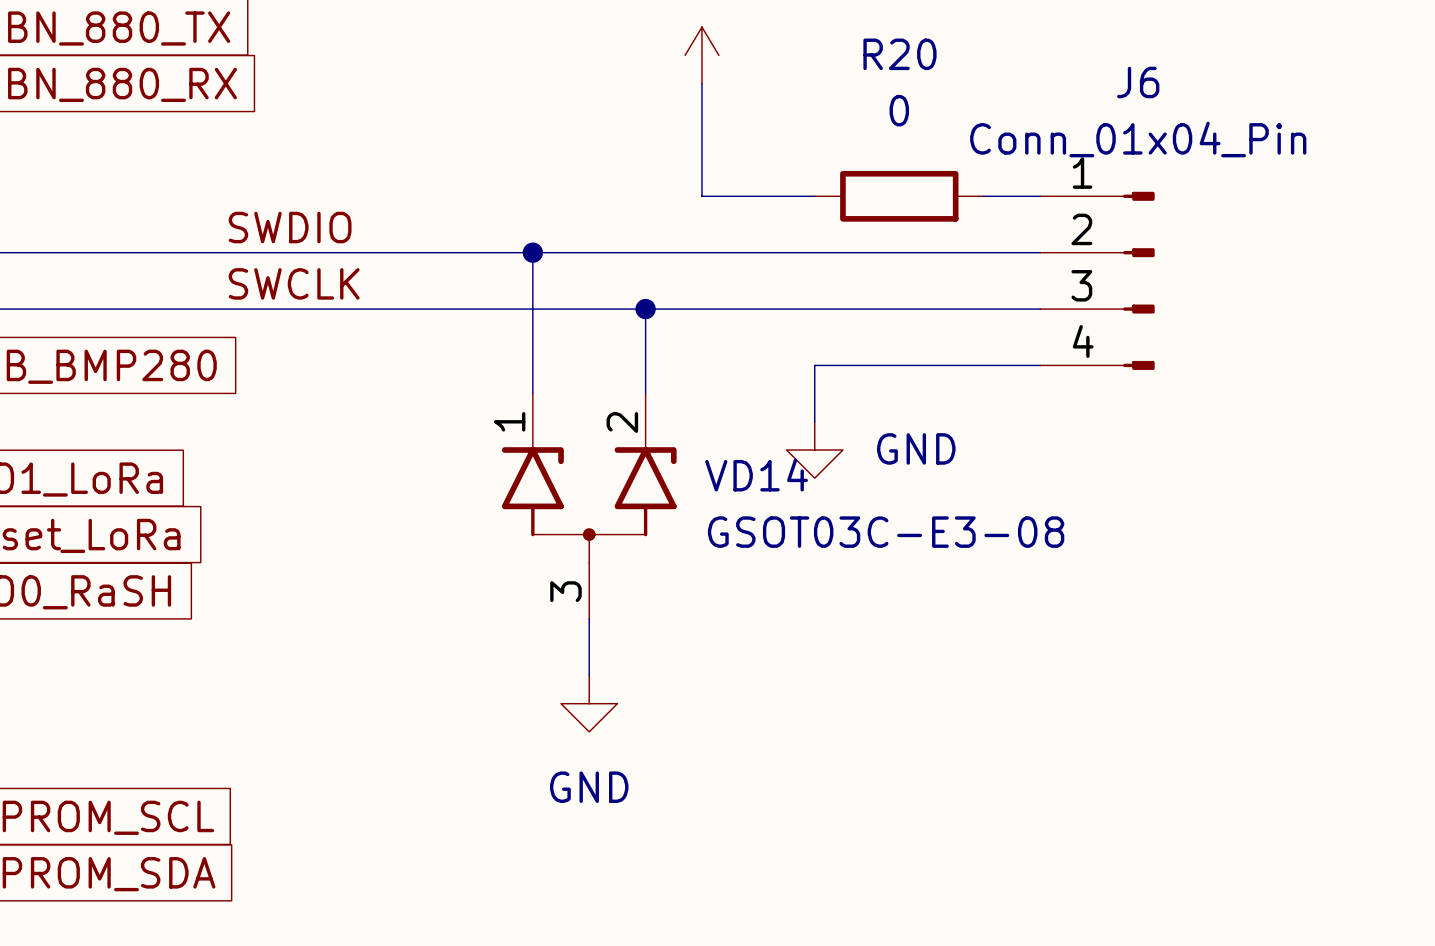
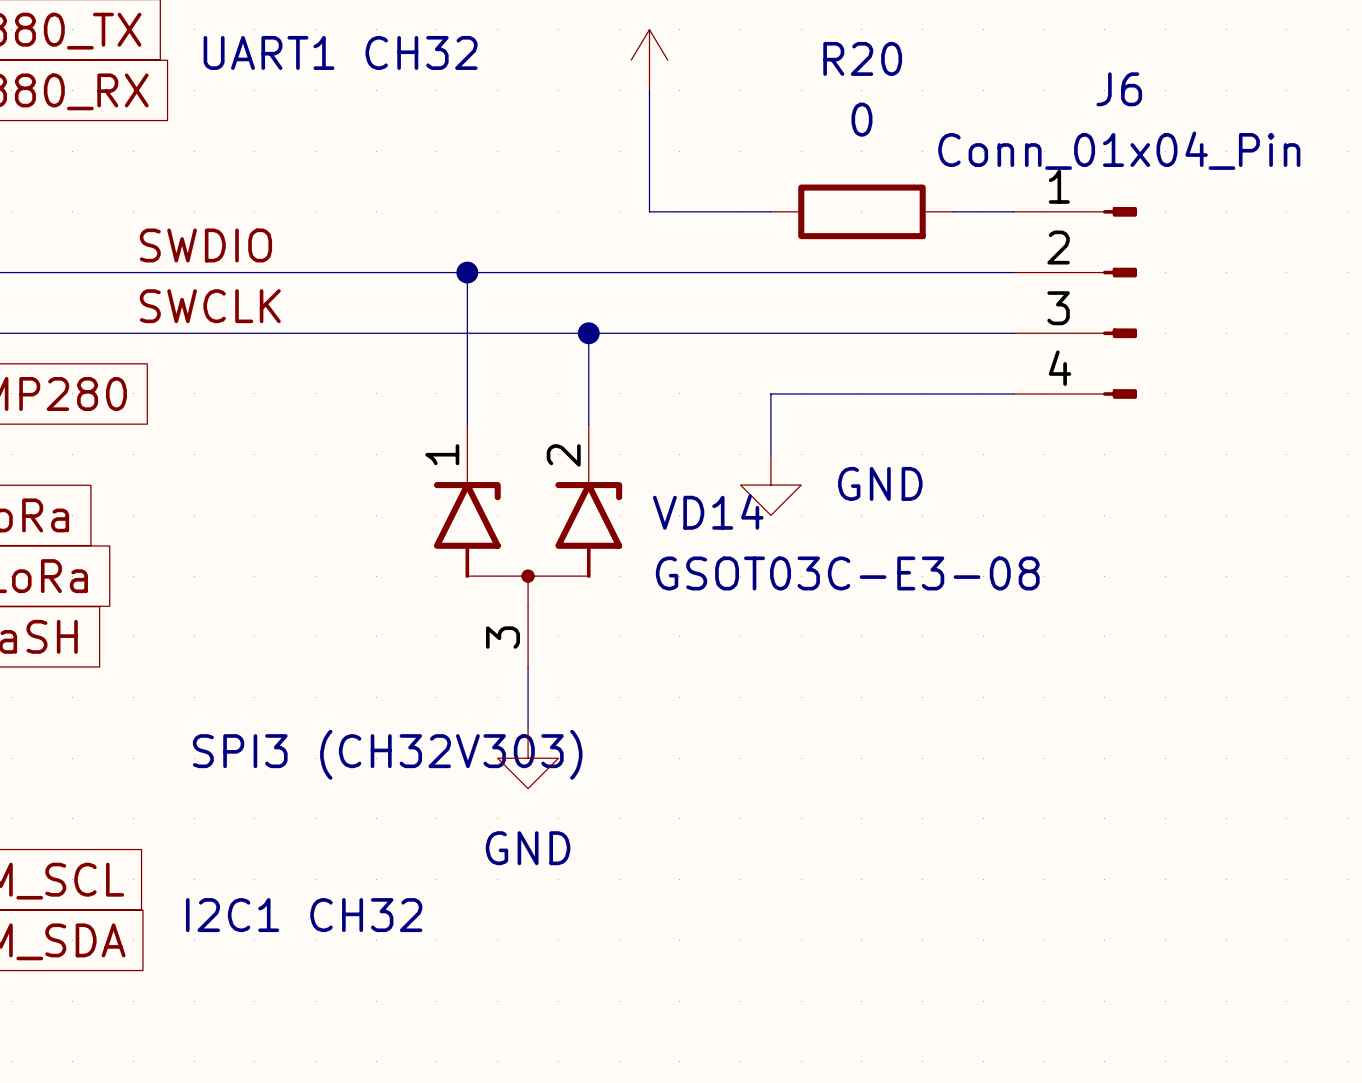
text: none -> UART1 CH32 (340, 52)
text: none -> SPI3 (CH32V303) (387, 754)
text: none -> I2C1 CH32 (304, 915)

